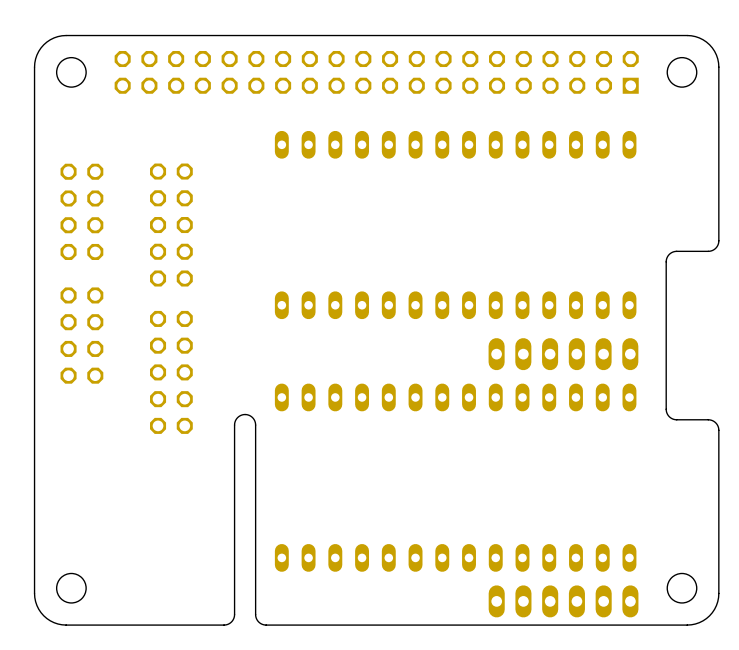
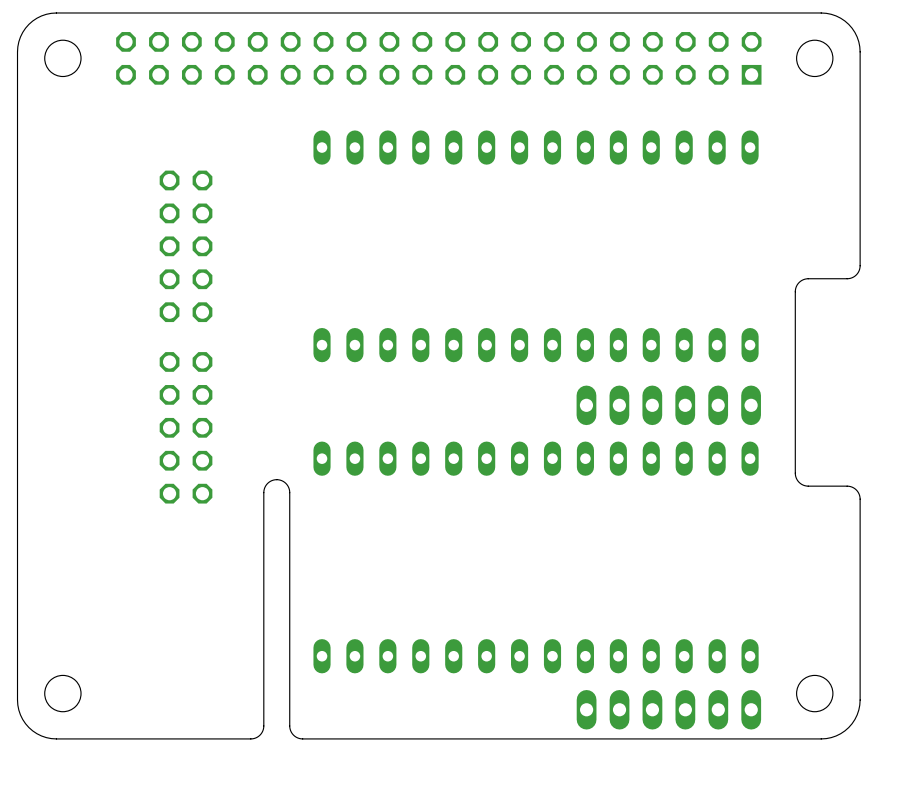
part: (81, 211) -> none
part: (81, 335) -> none

